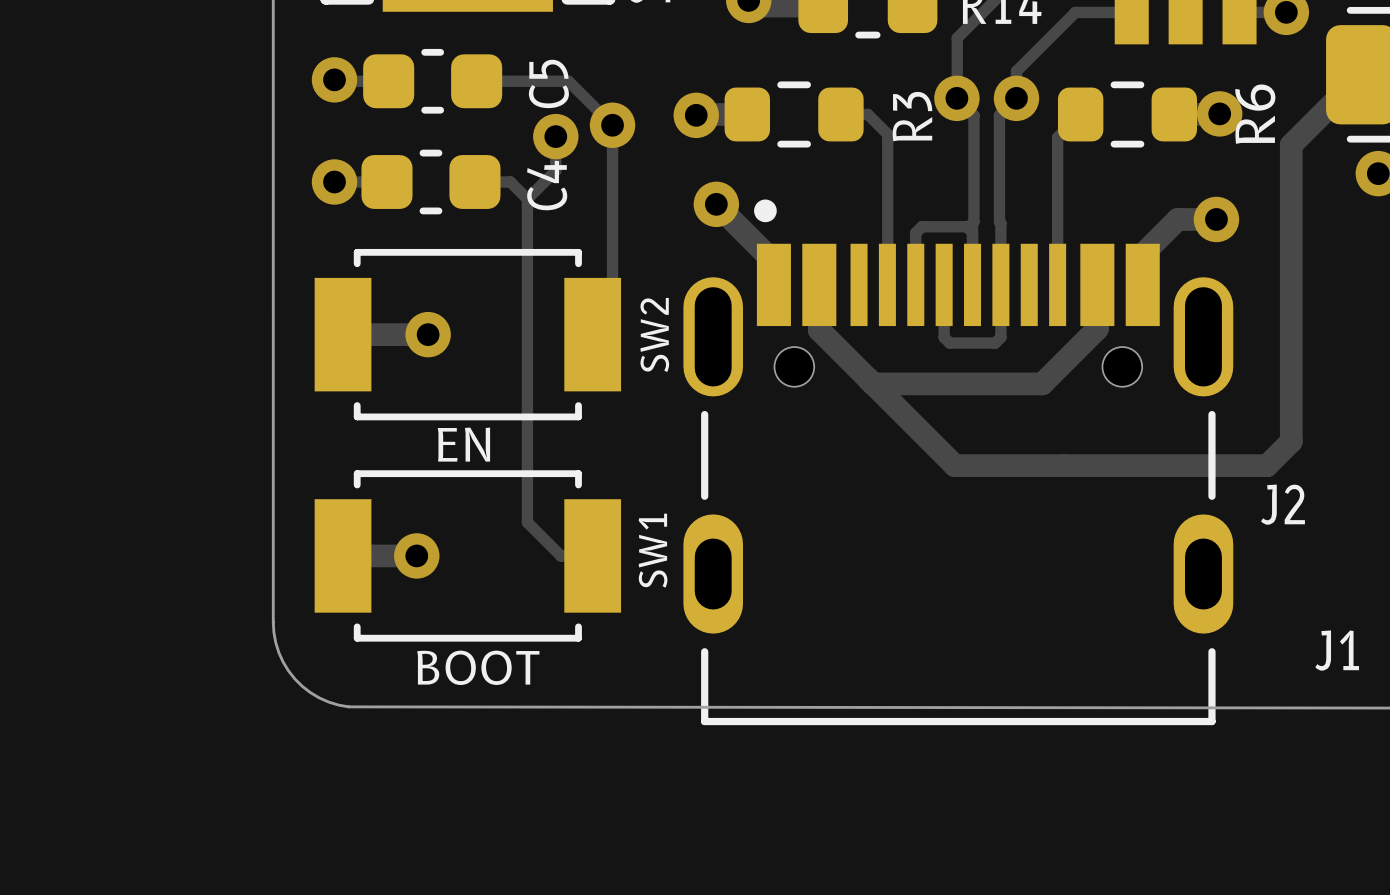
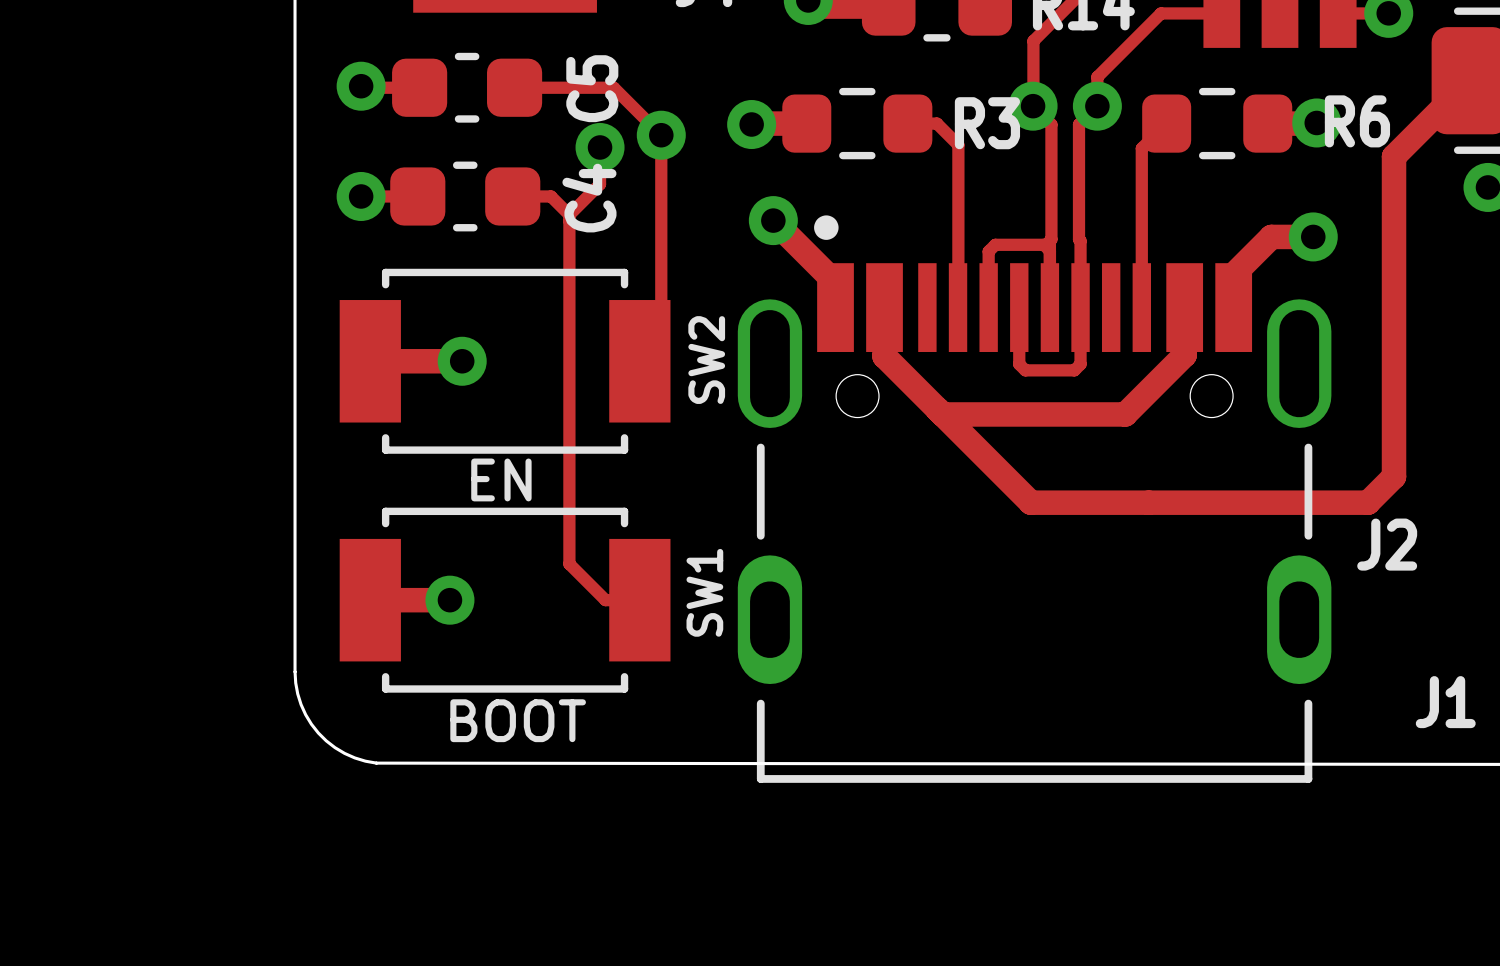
R6 name rotation: 0° (1255, 114) -> 90° clockwise (1357, 121)
R3 name rotation: 0° (912, 116) -> 90° clockwise (987, 123)

